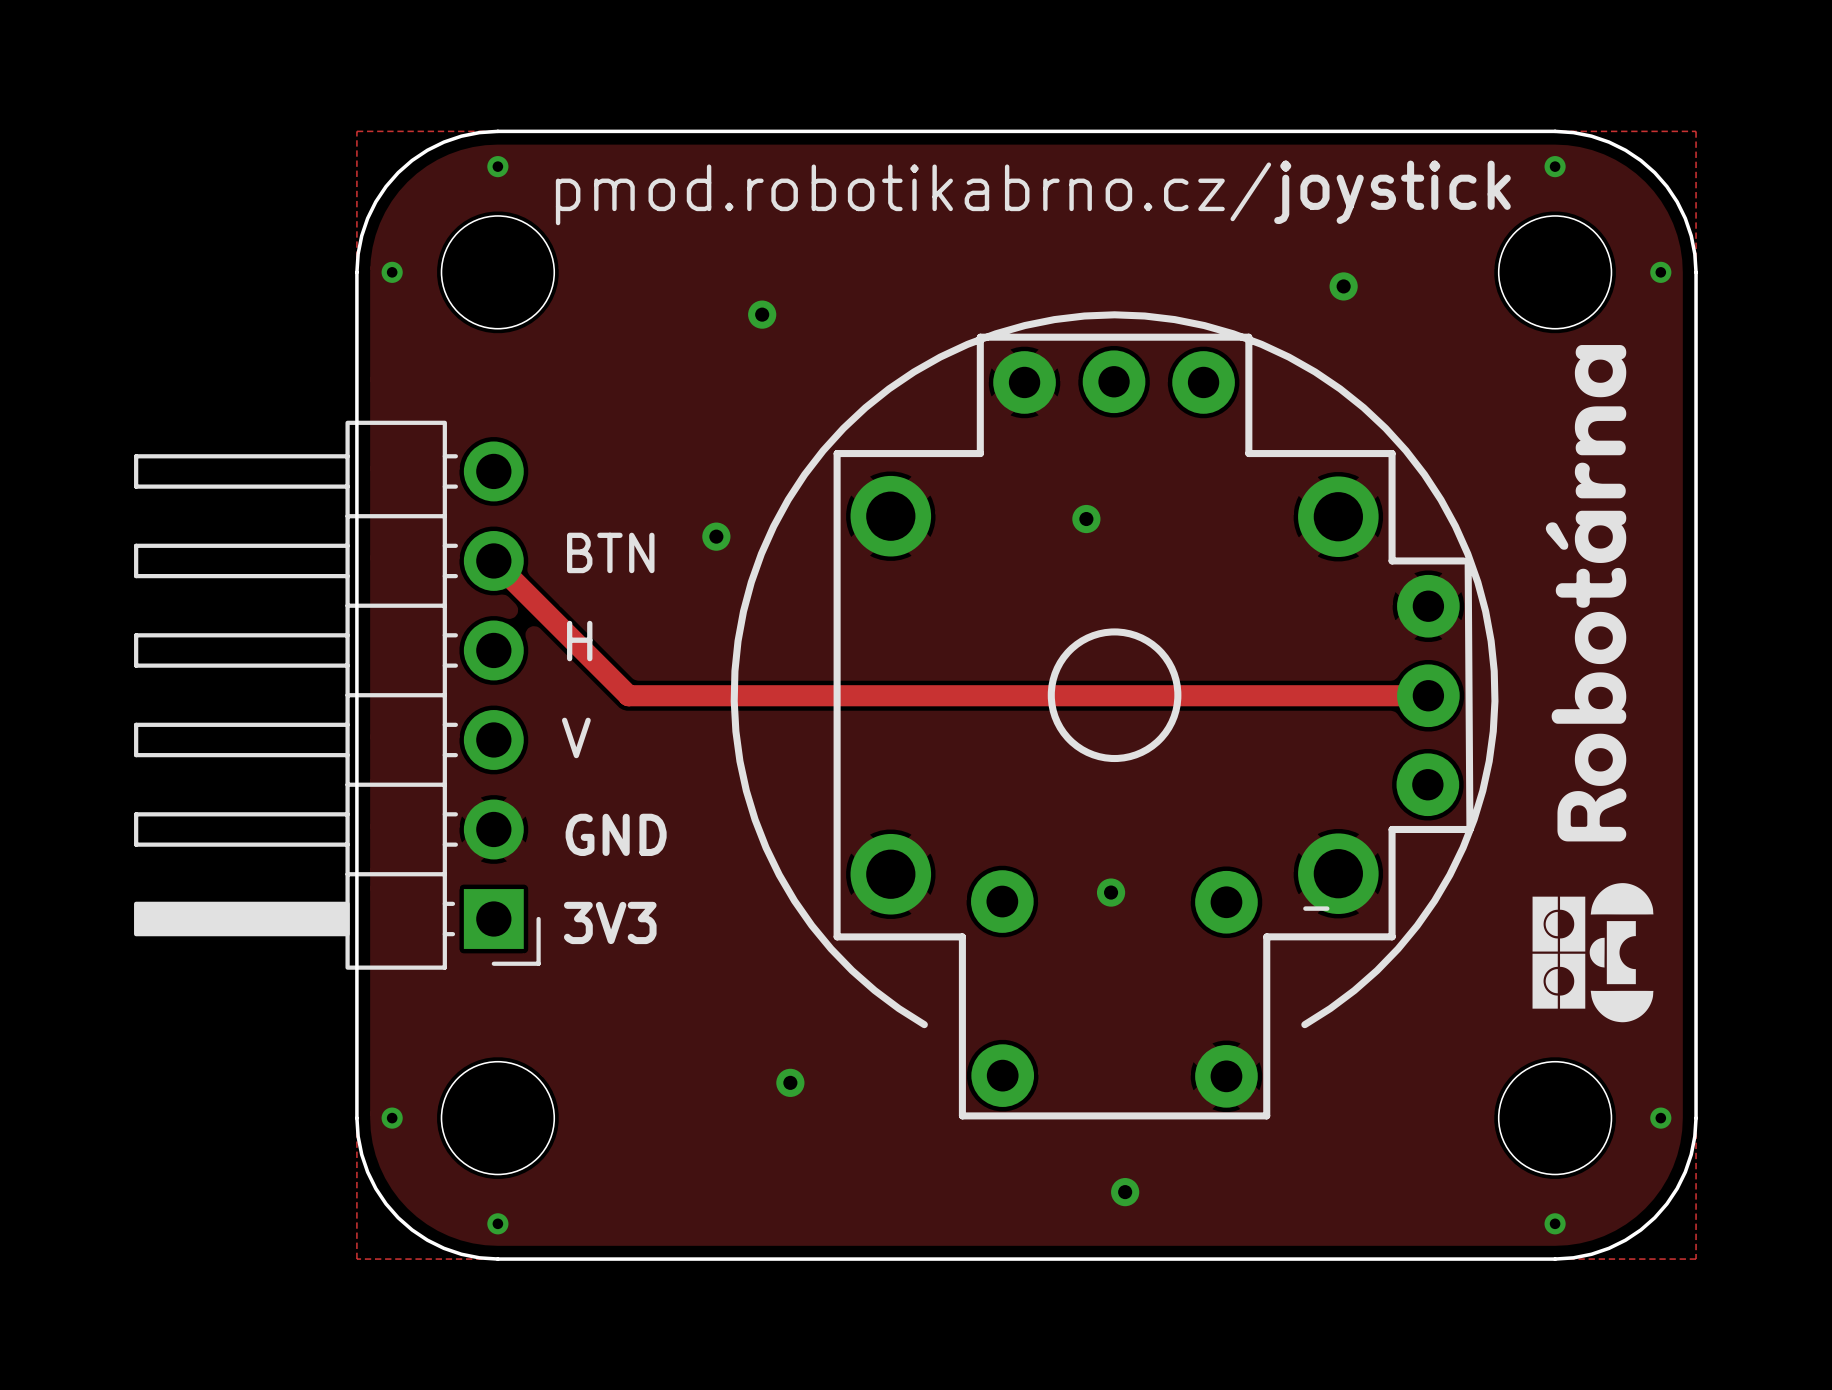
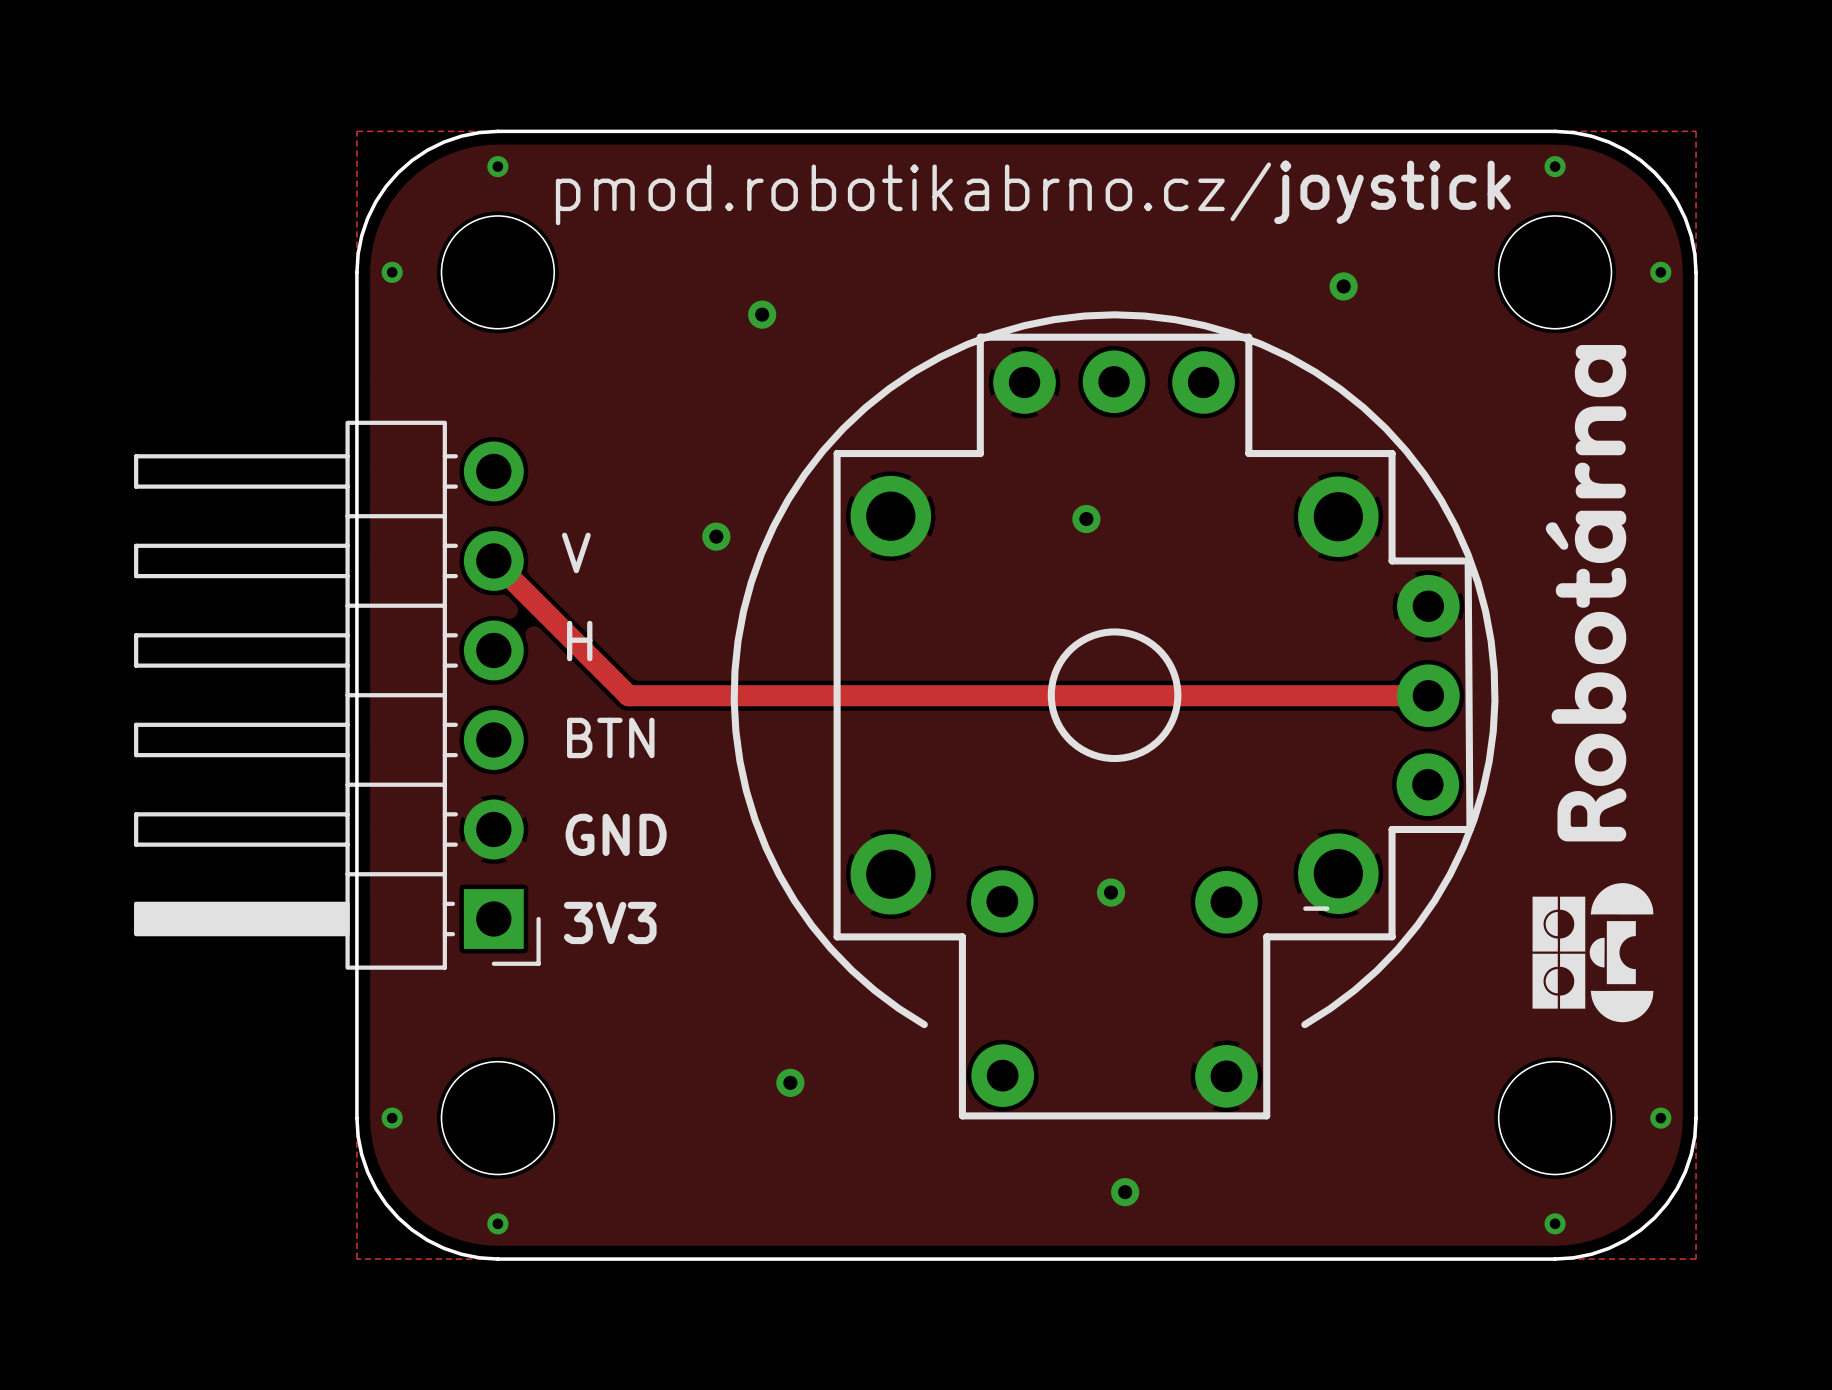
text: BTN (610, 552) -> V (576, 552)
text: V (576, 737) -> BTN (610, 737)

